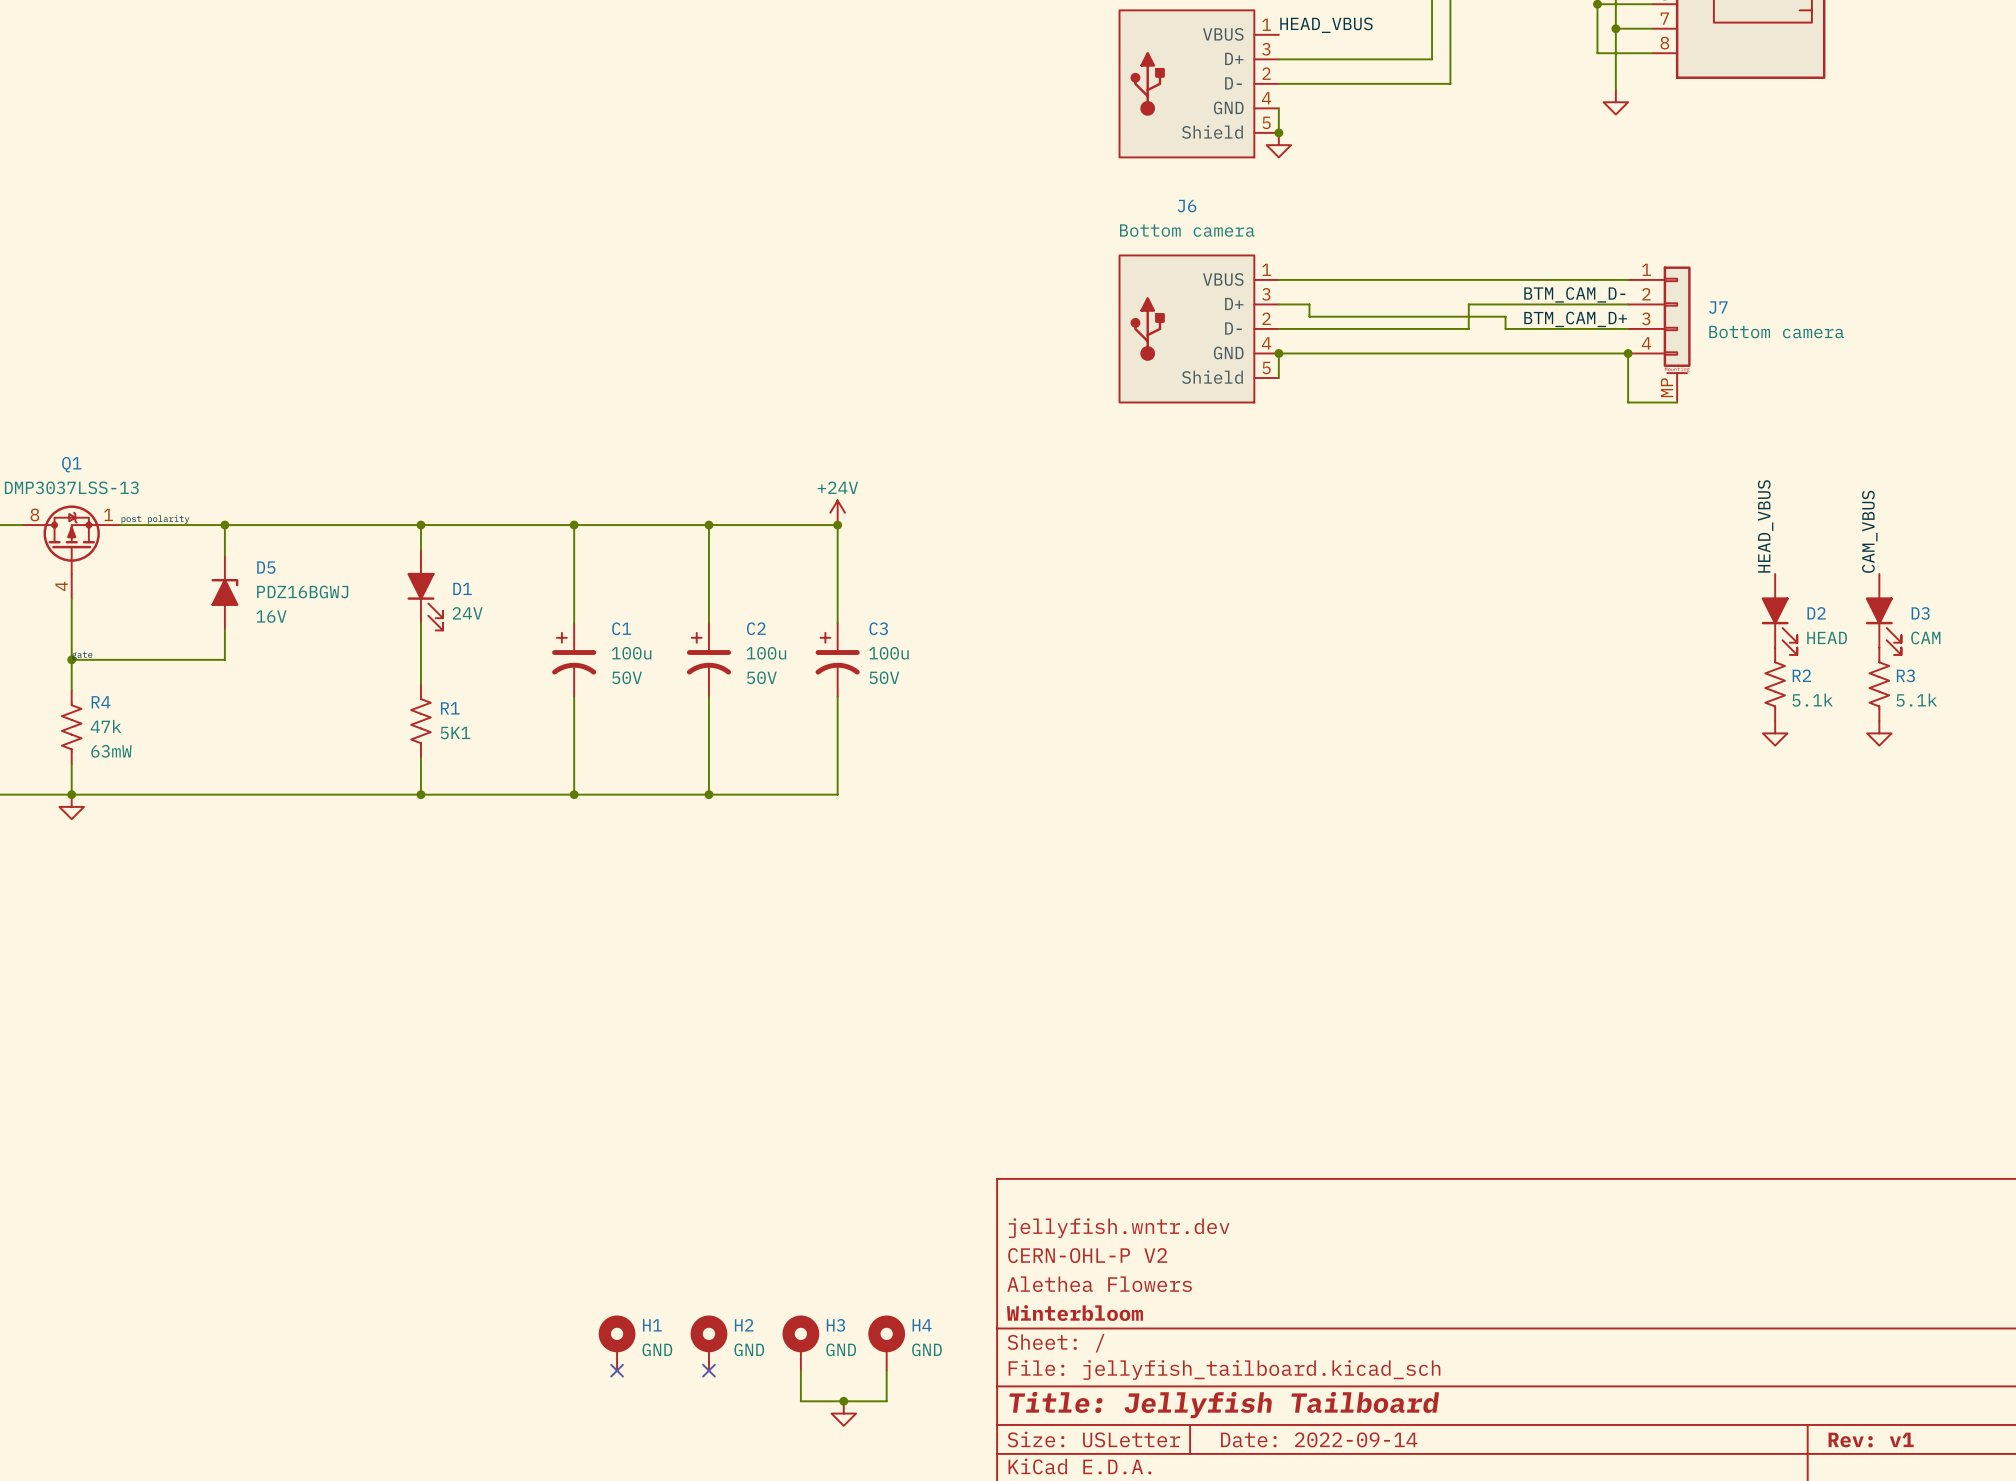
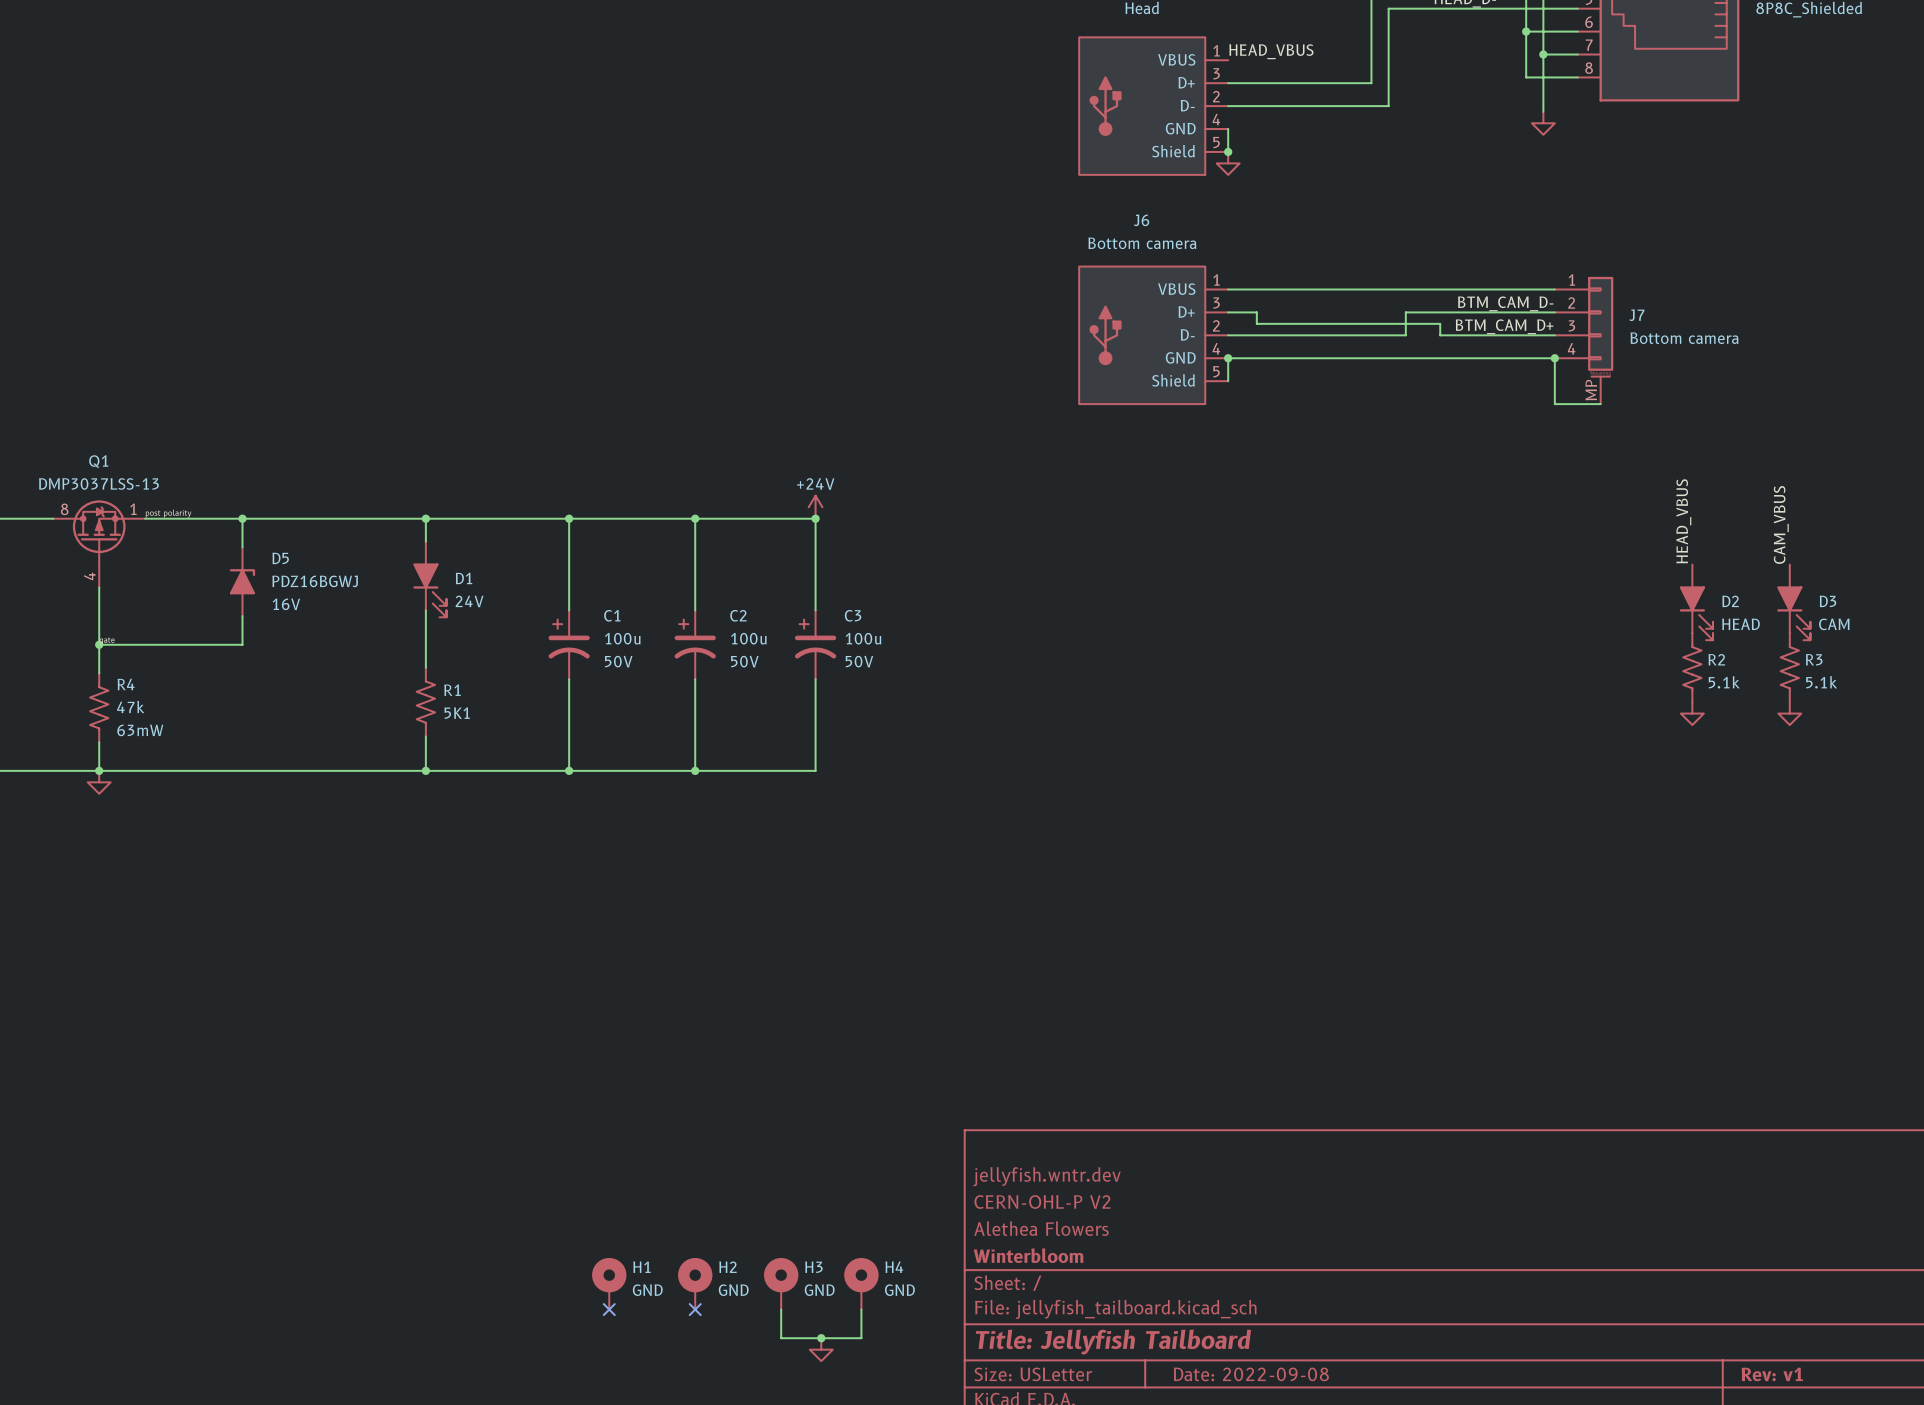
title block: Date: 2022-09-14 (1319, 1439) -> Date: 2022-09-08 (1251, 1374)

